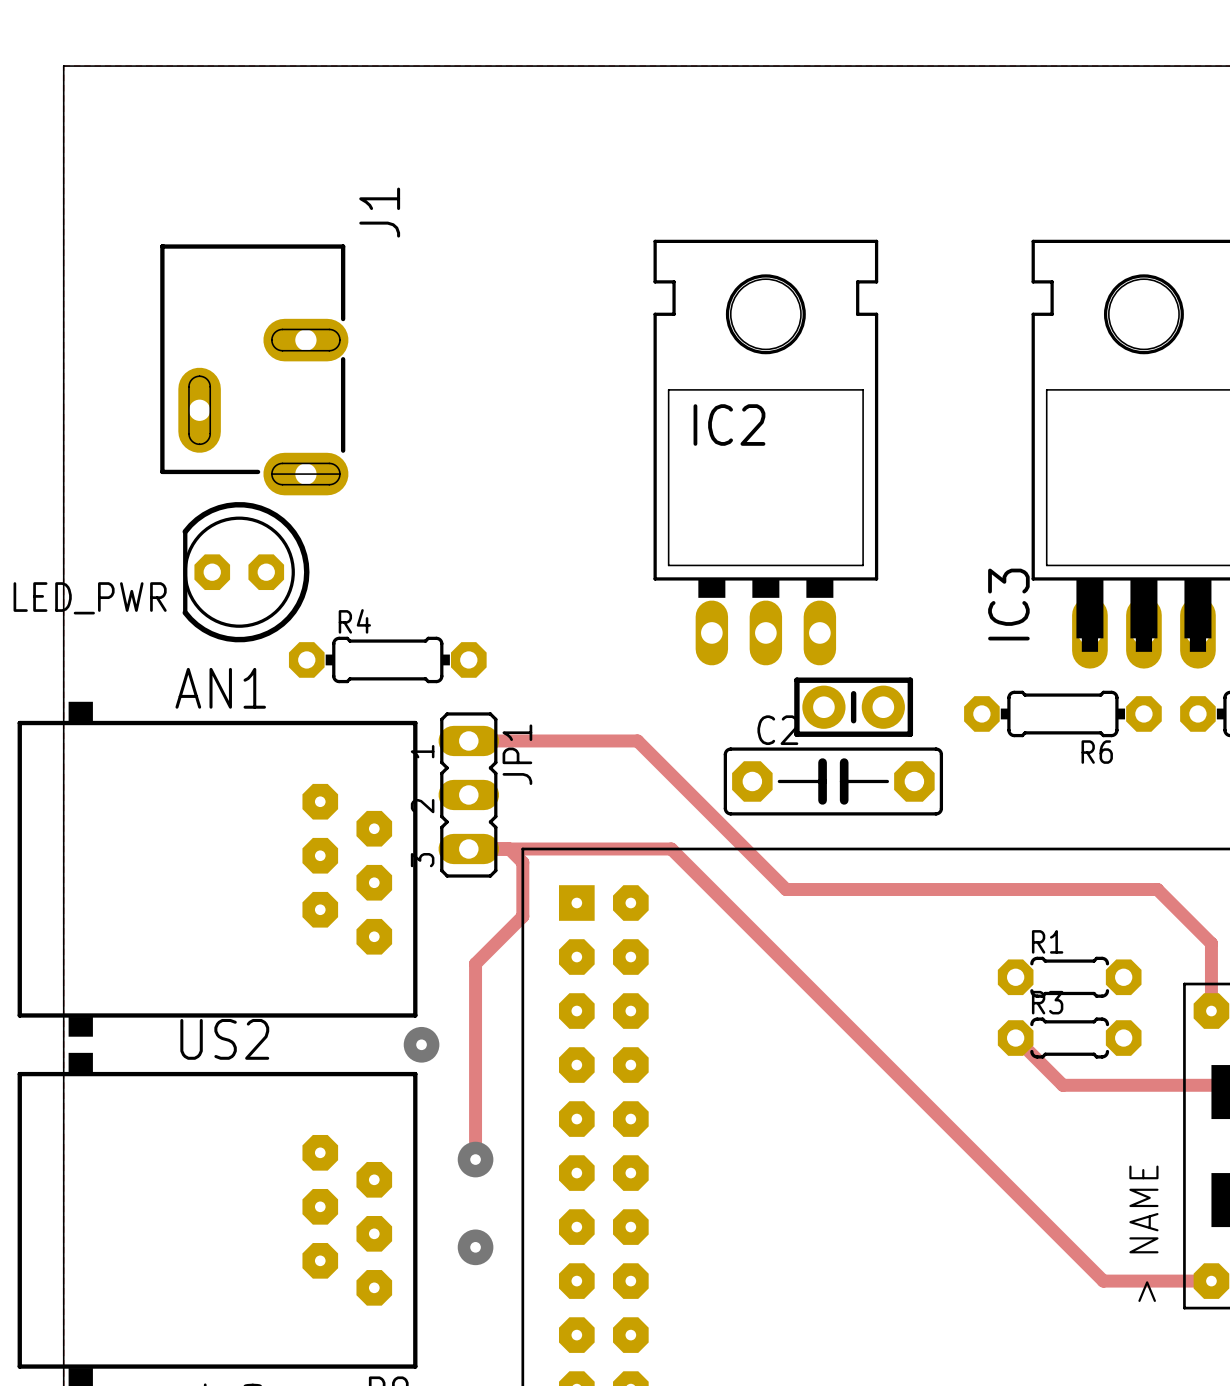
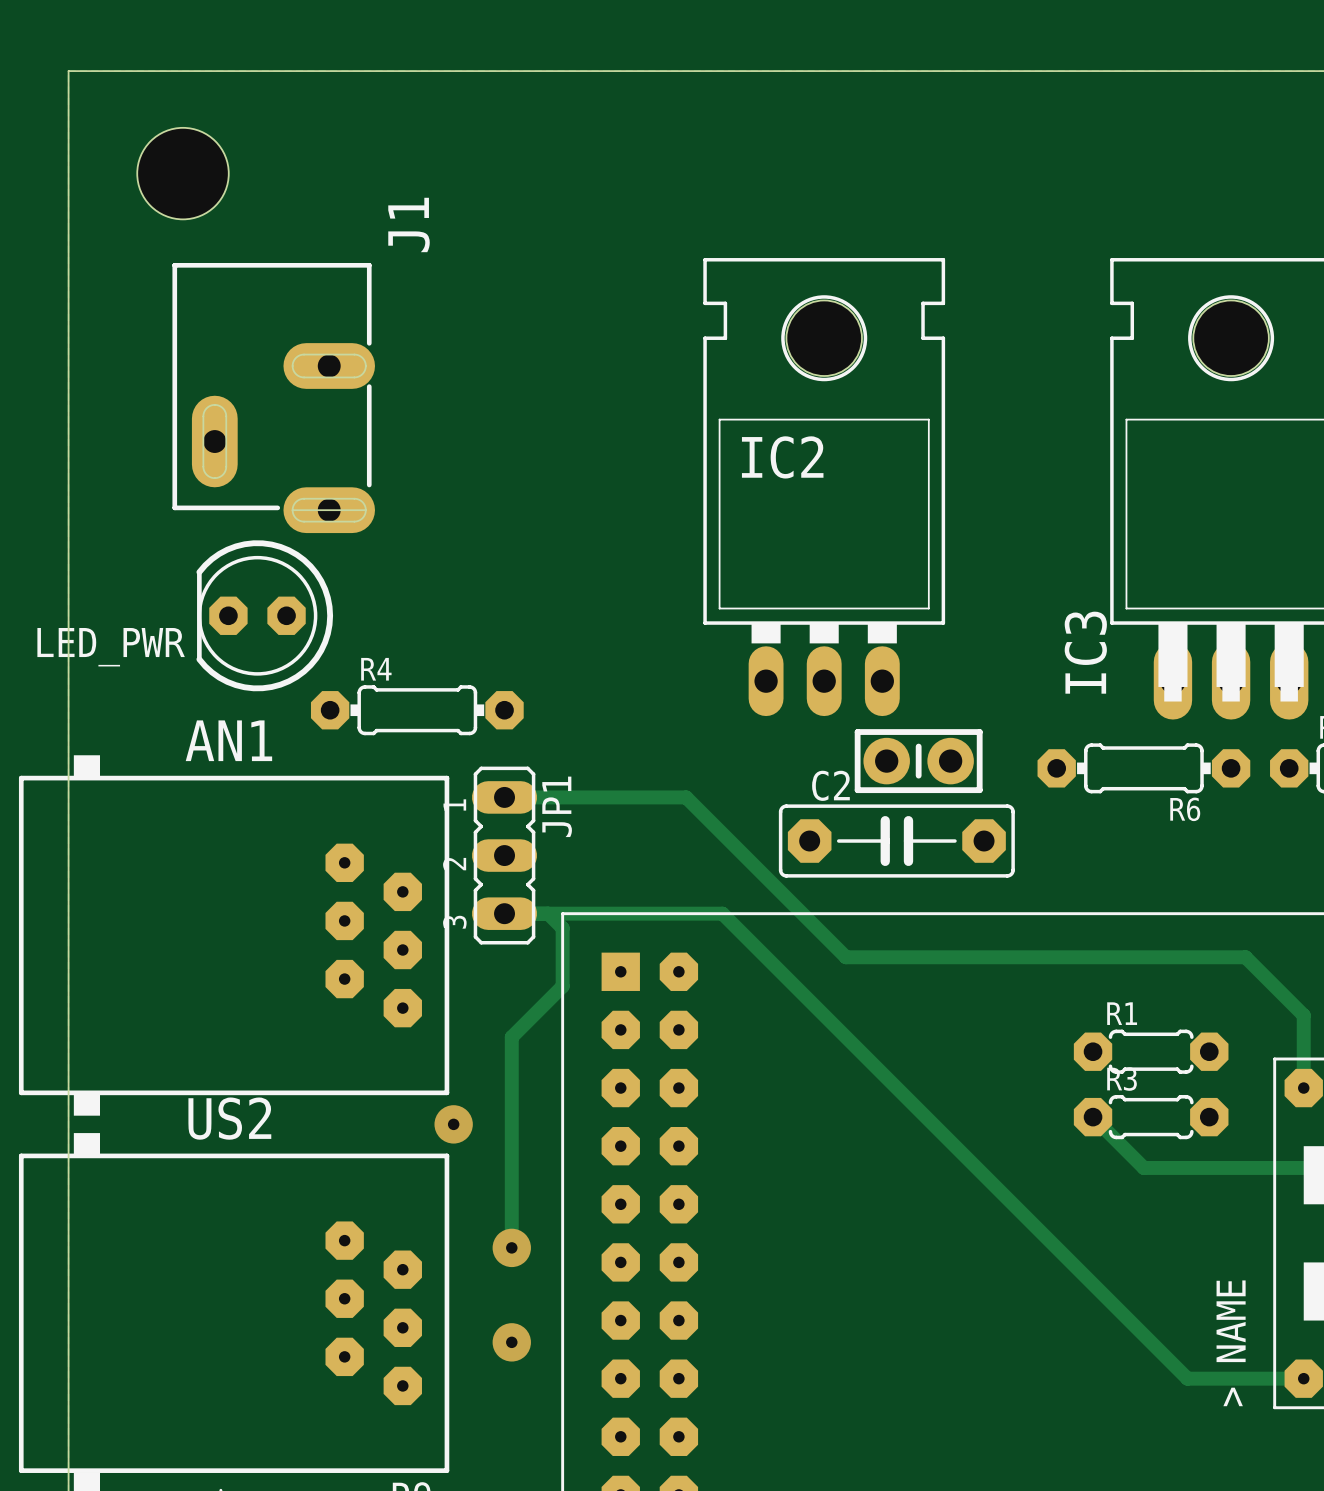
hole: none -> (183, 173)

